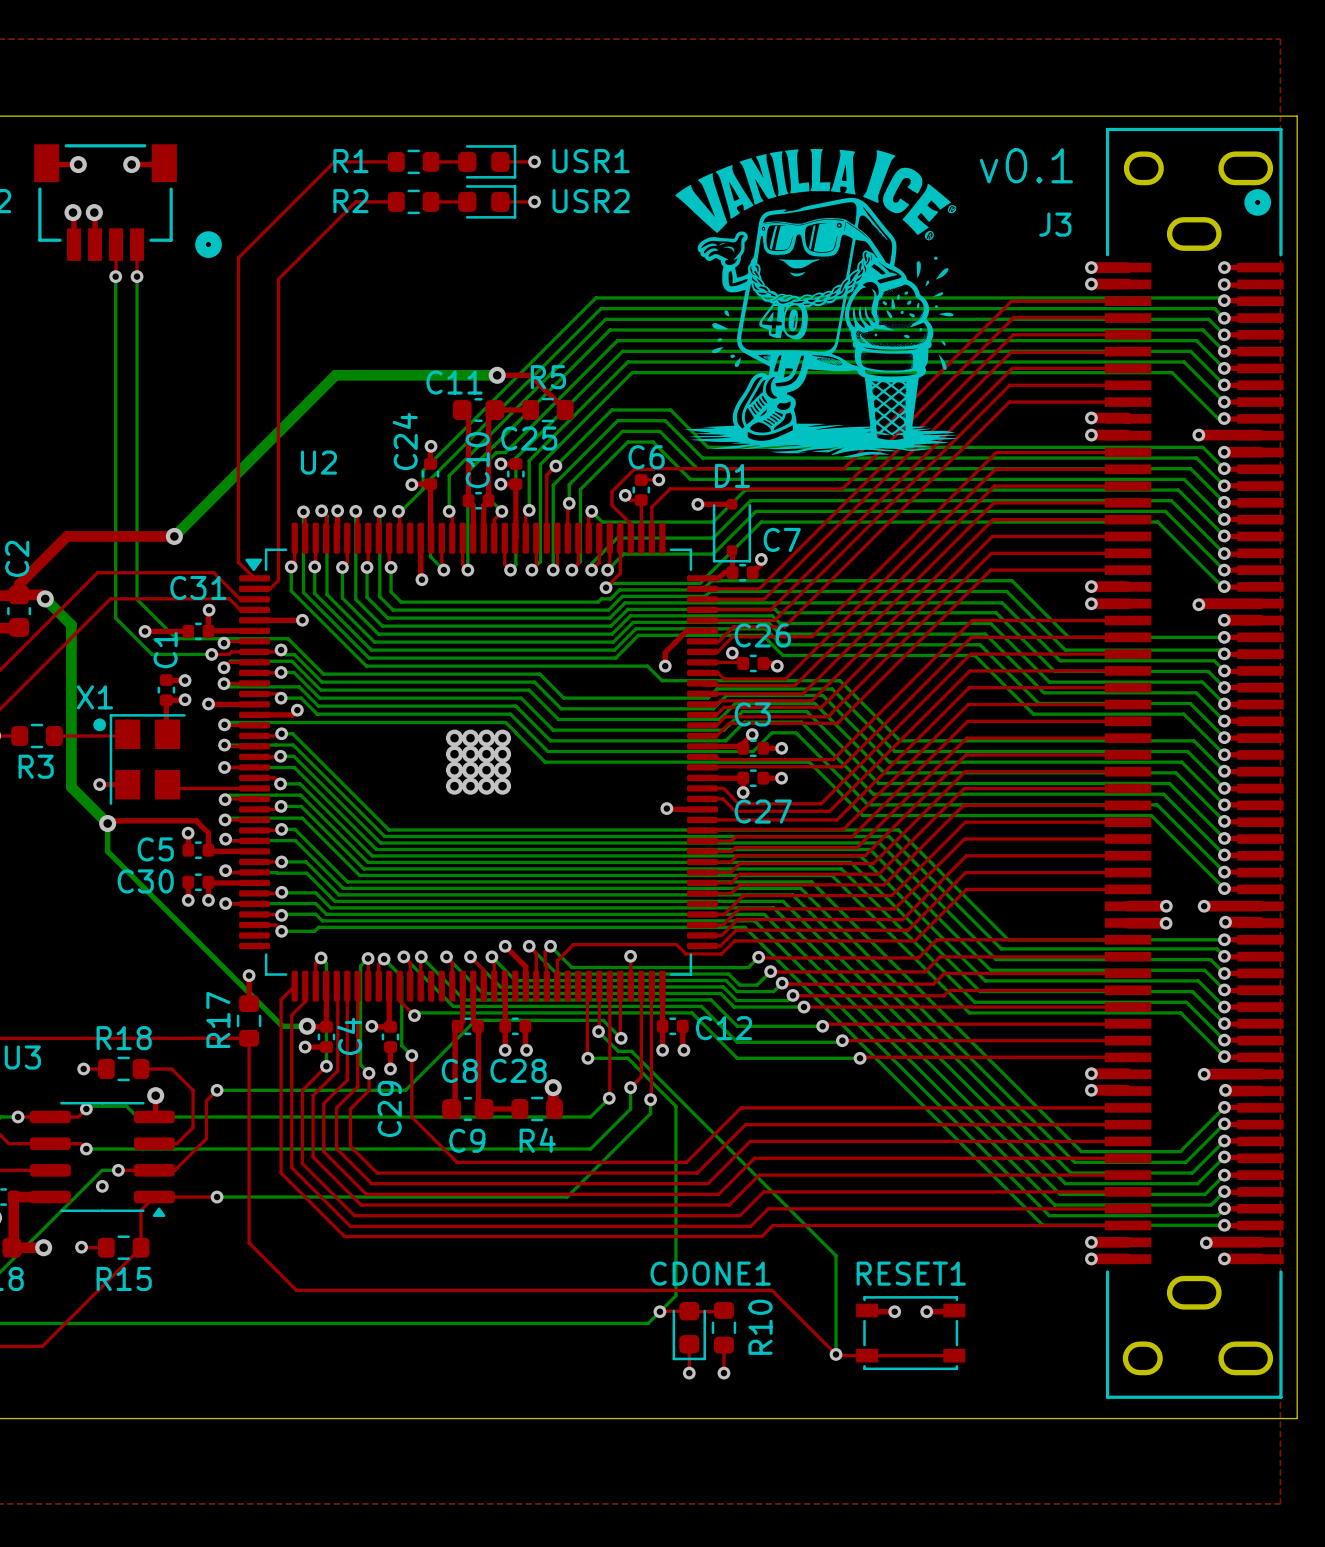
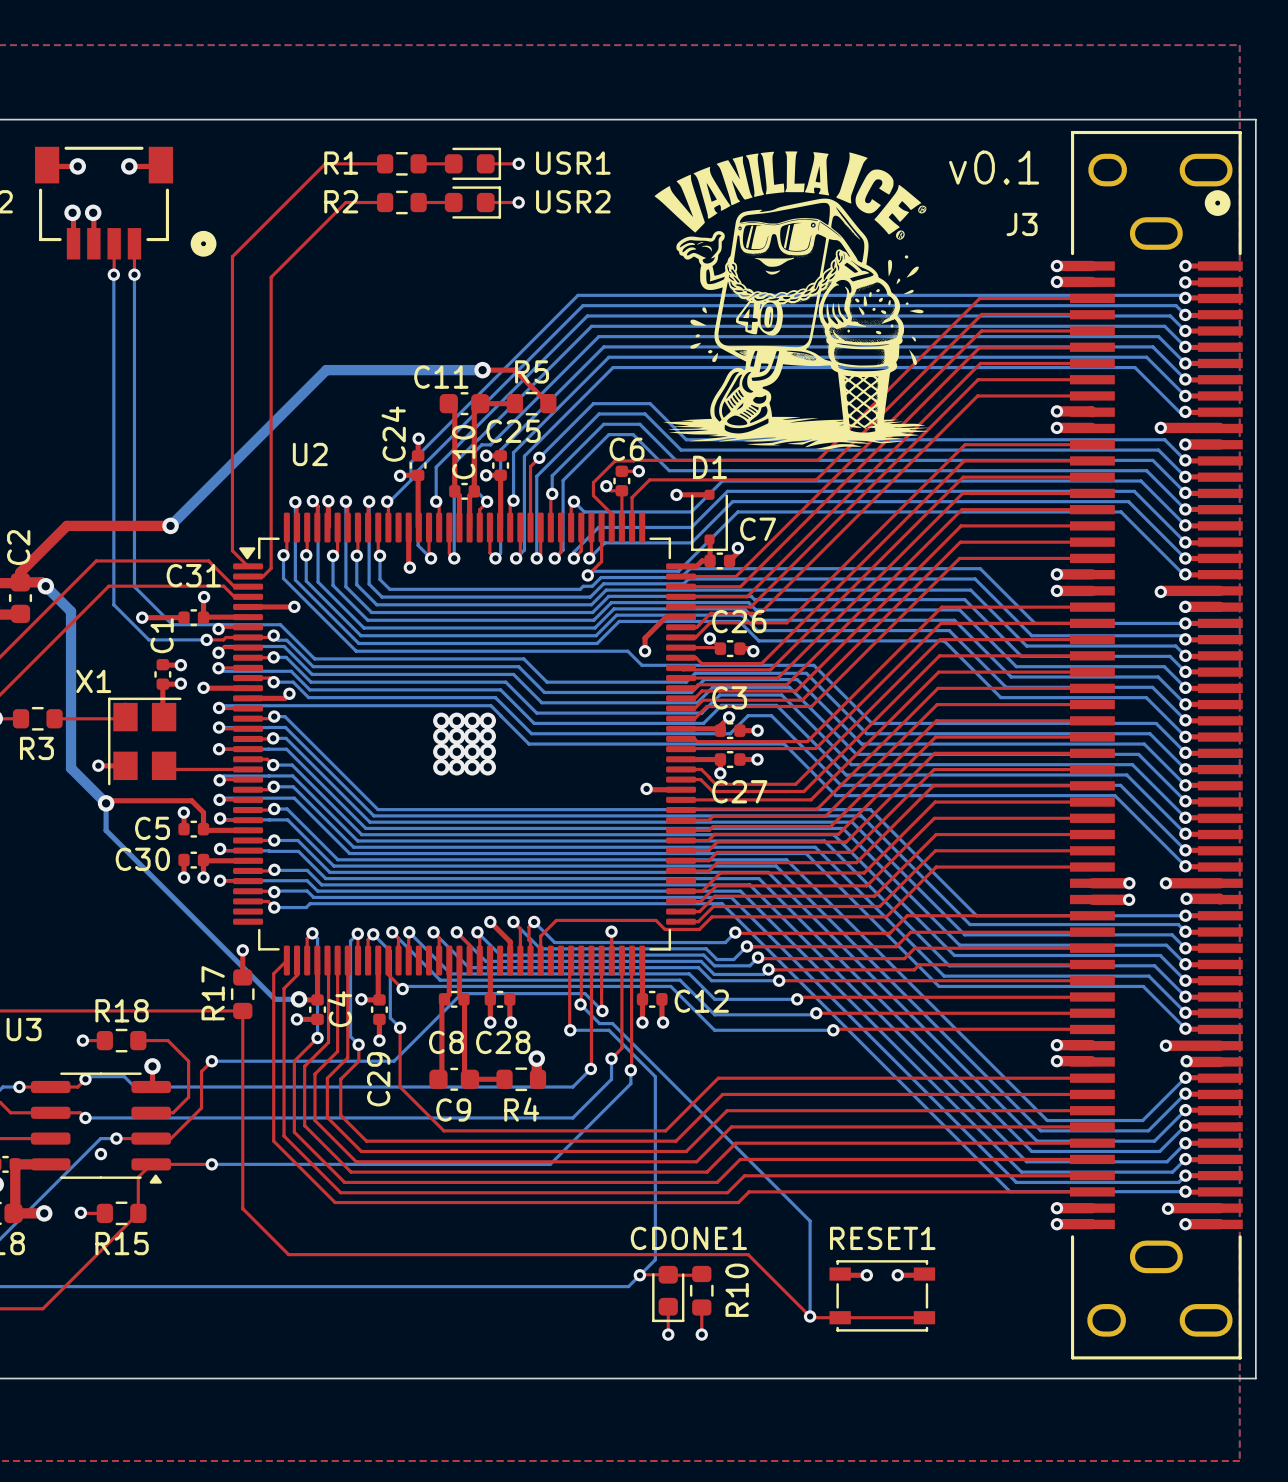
drawing: [93, 718, 107, 732] -> none

